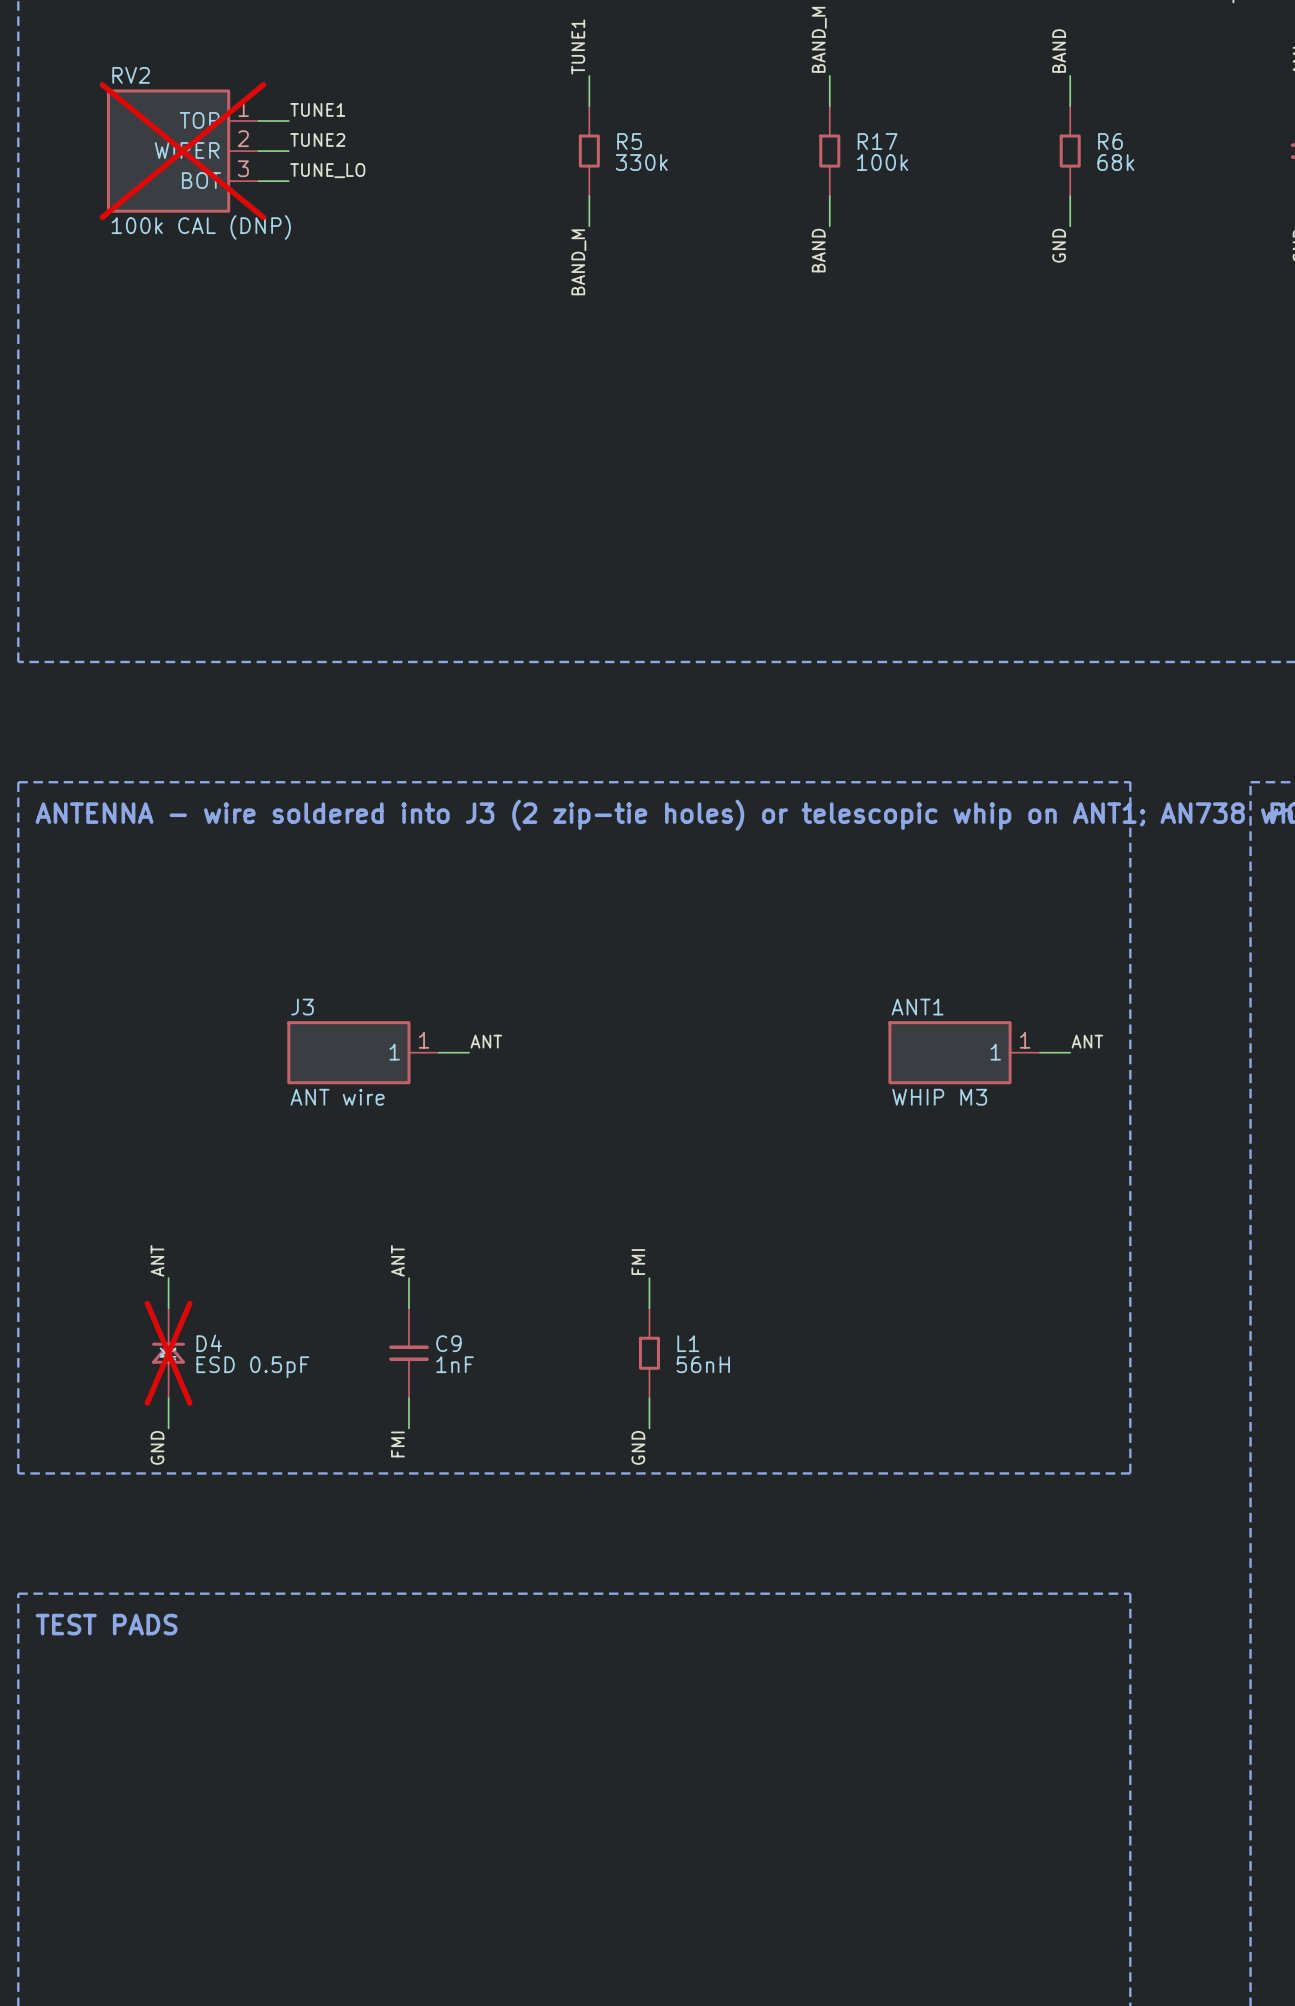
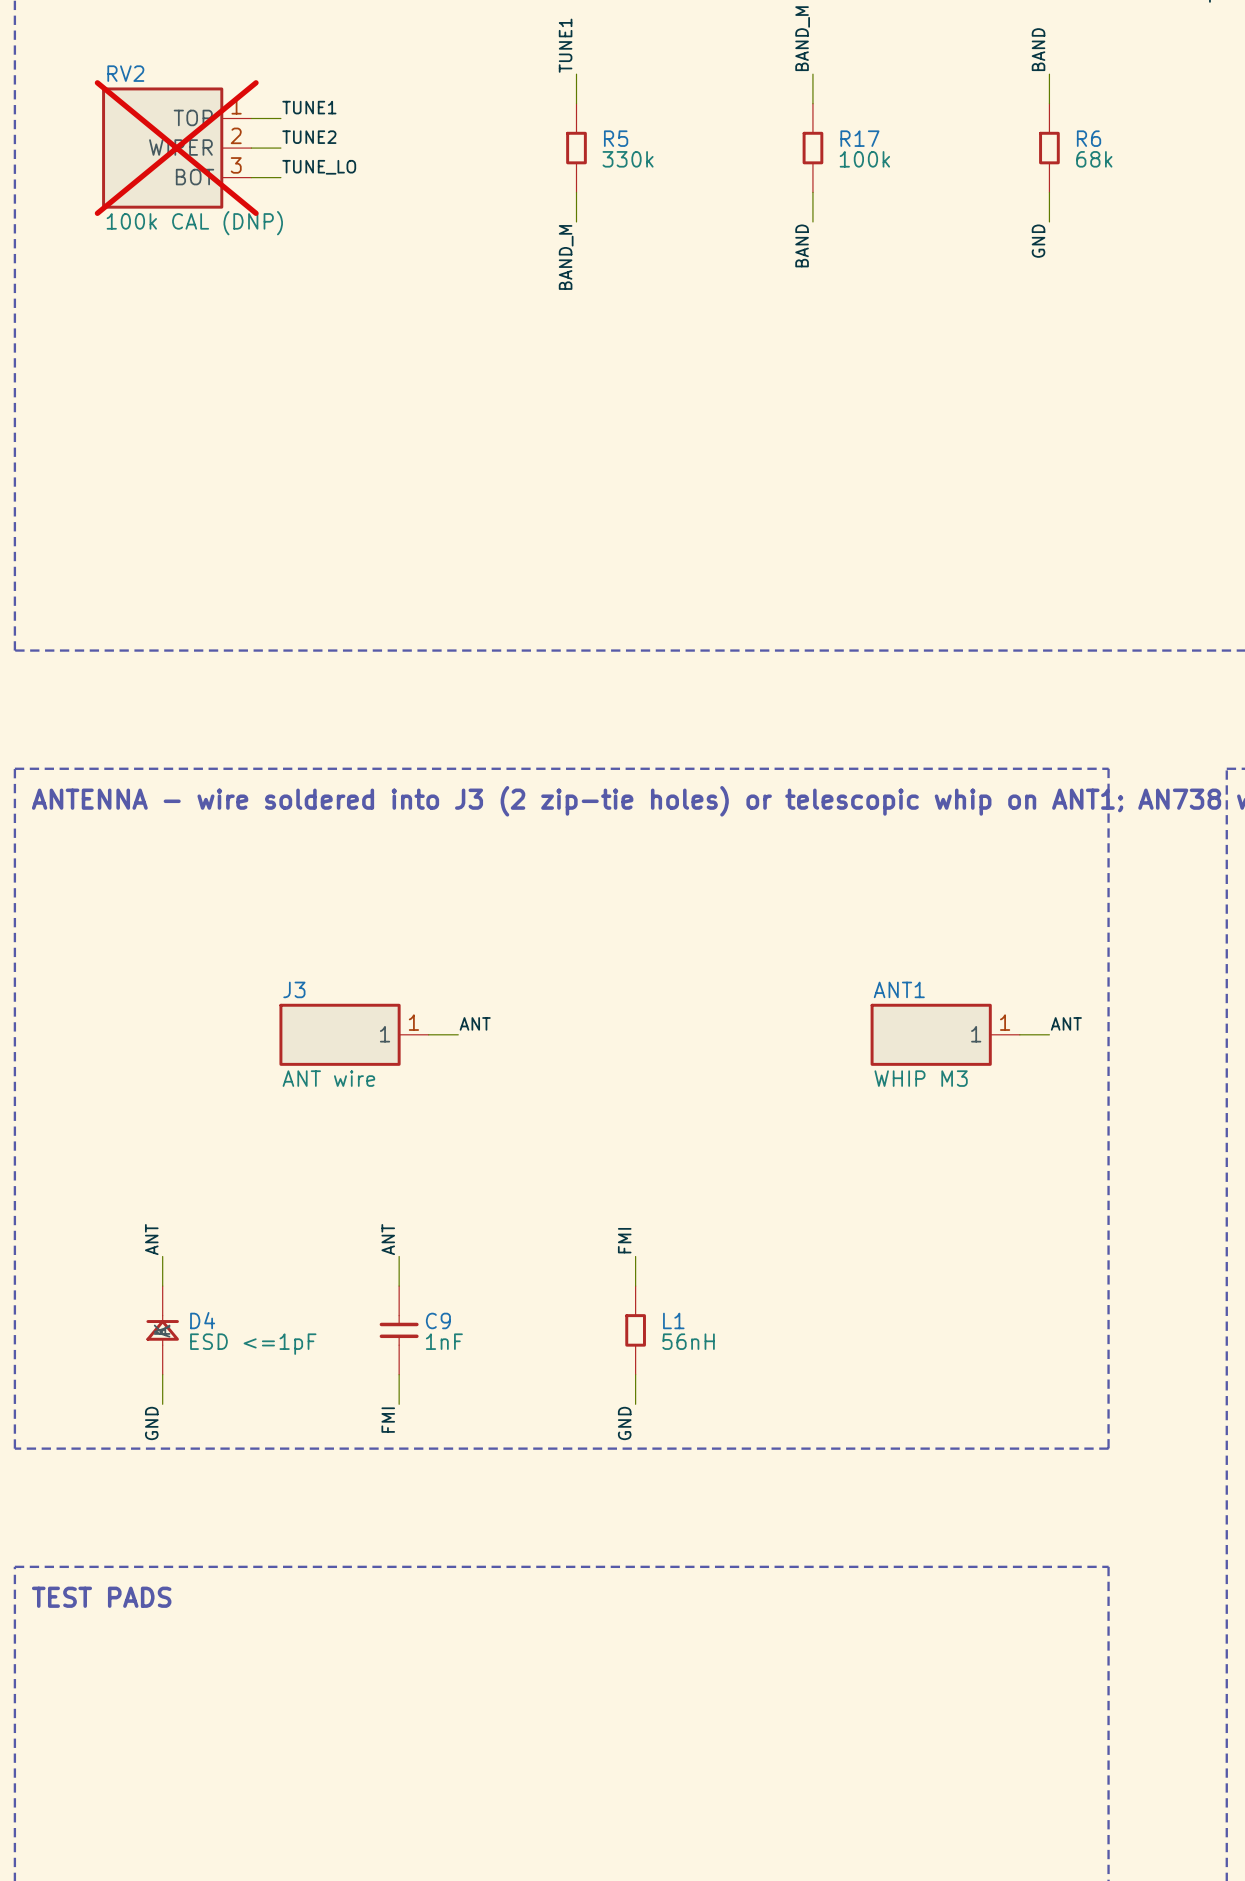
D4 do-not-place cross: (168, 1353) -> none
D4 value: ESD 0.5pF (252, 1367) -> ESD <=1pF (253, 1344)

